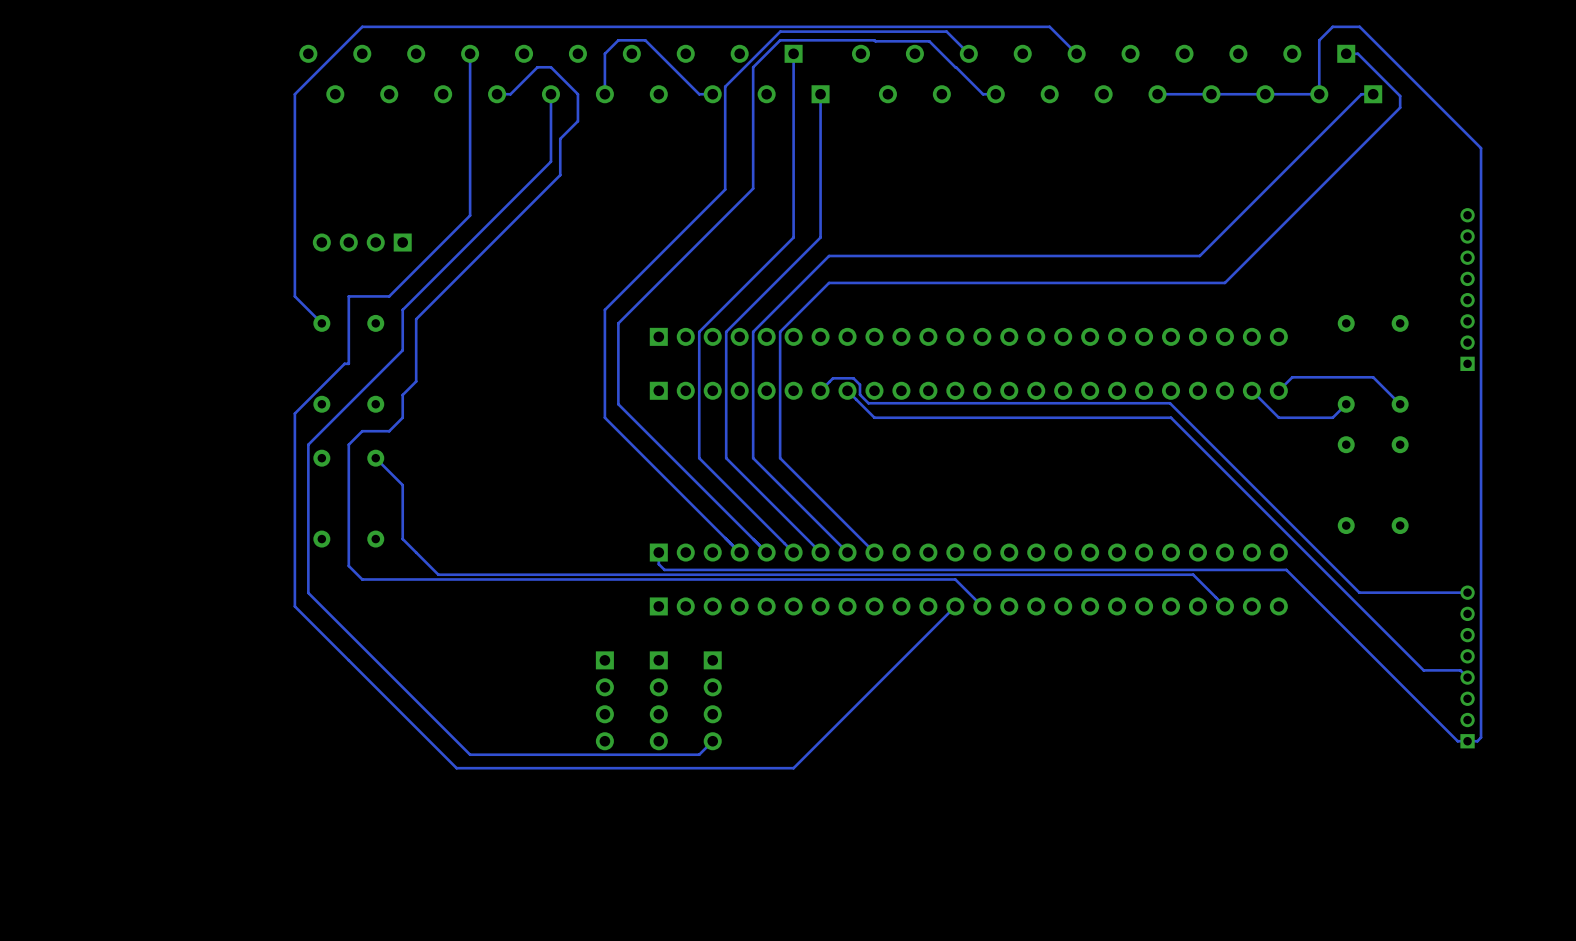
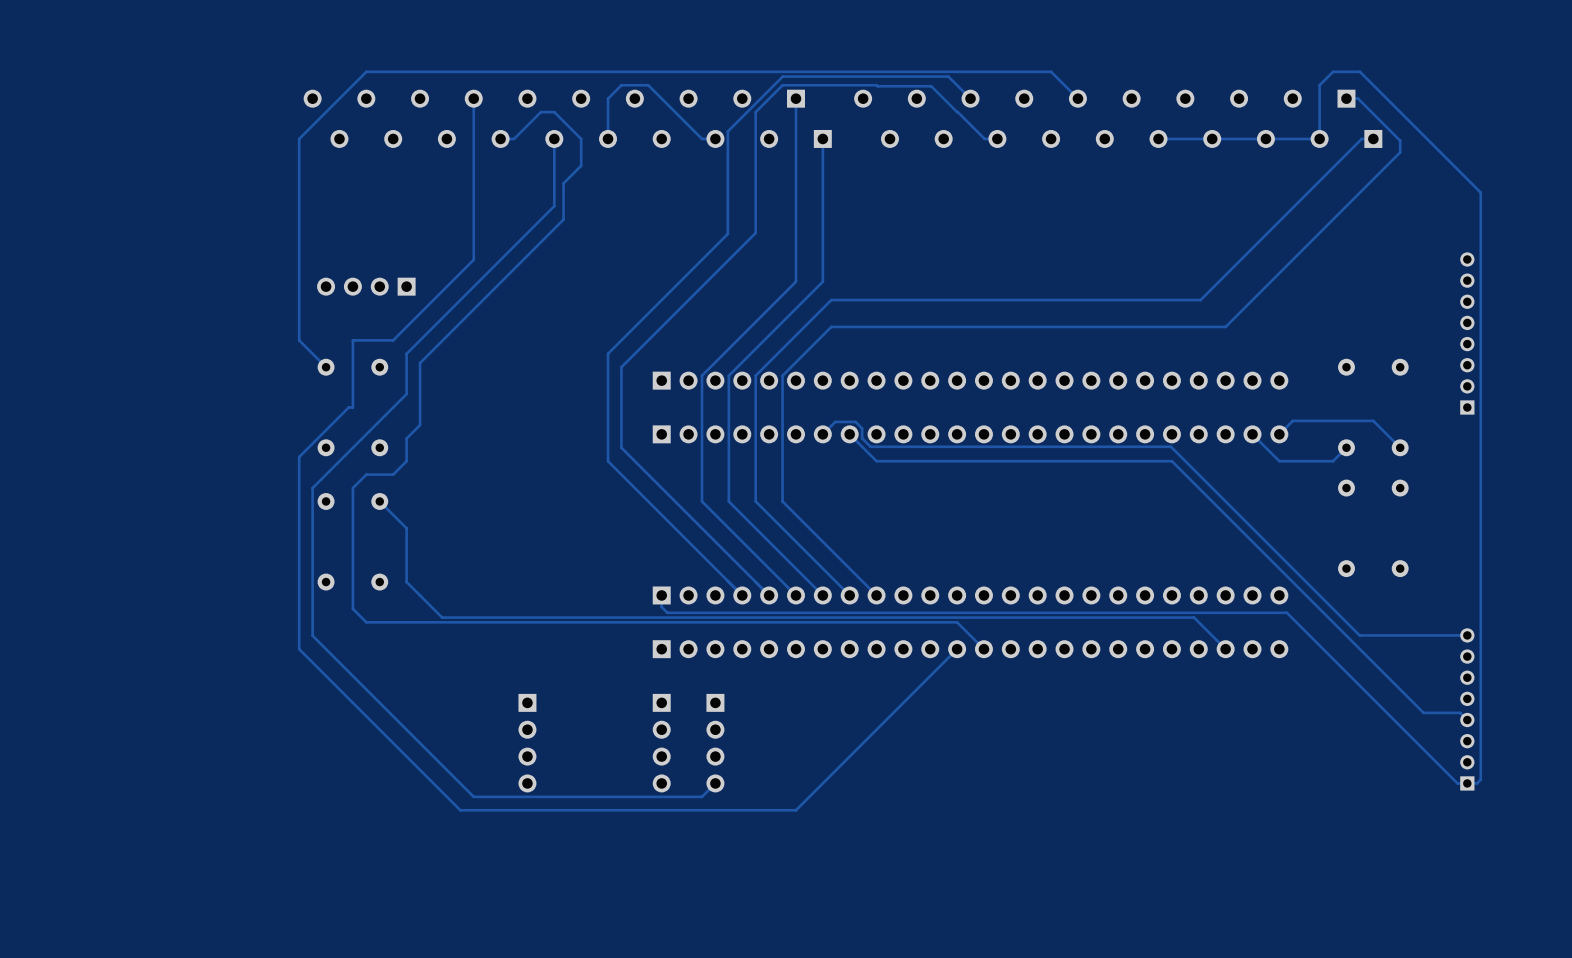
part position: (604, 700) -> (527, 743)

